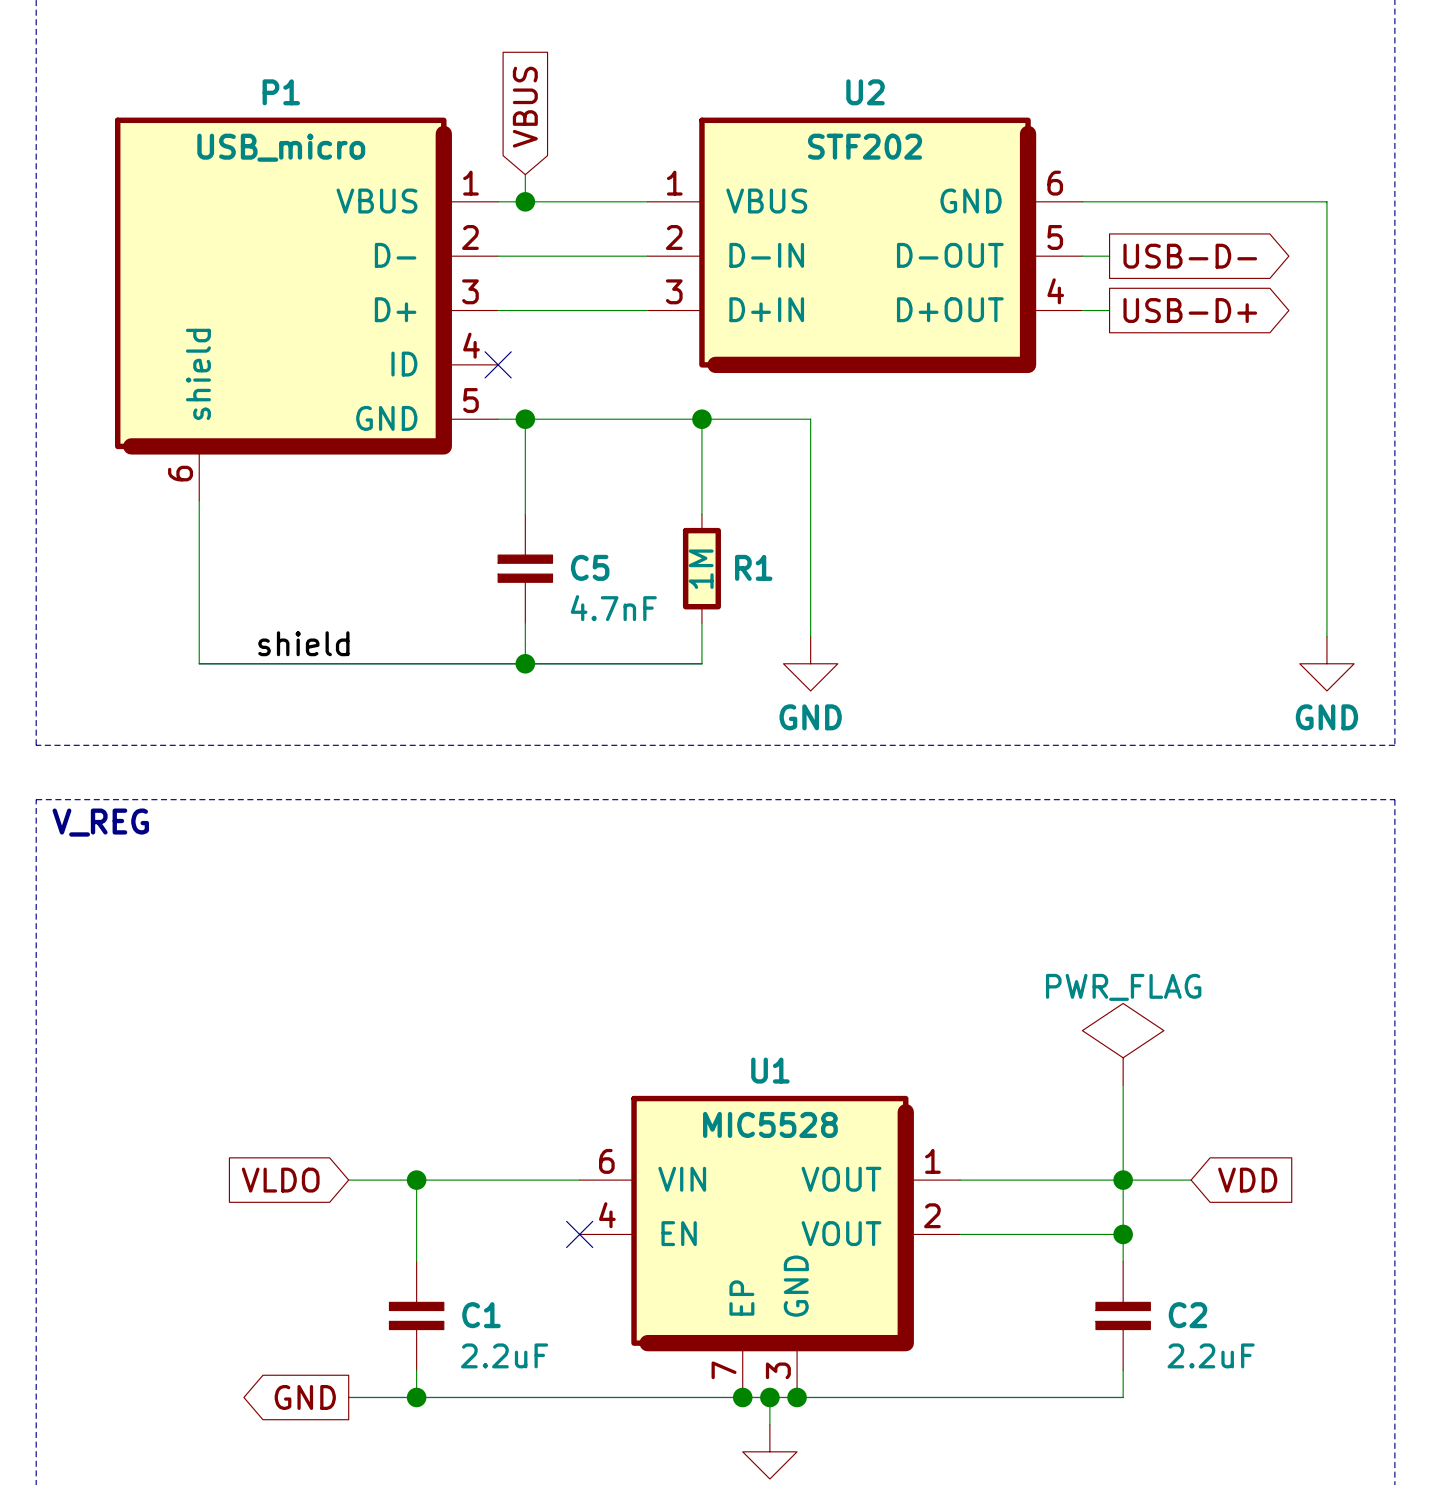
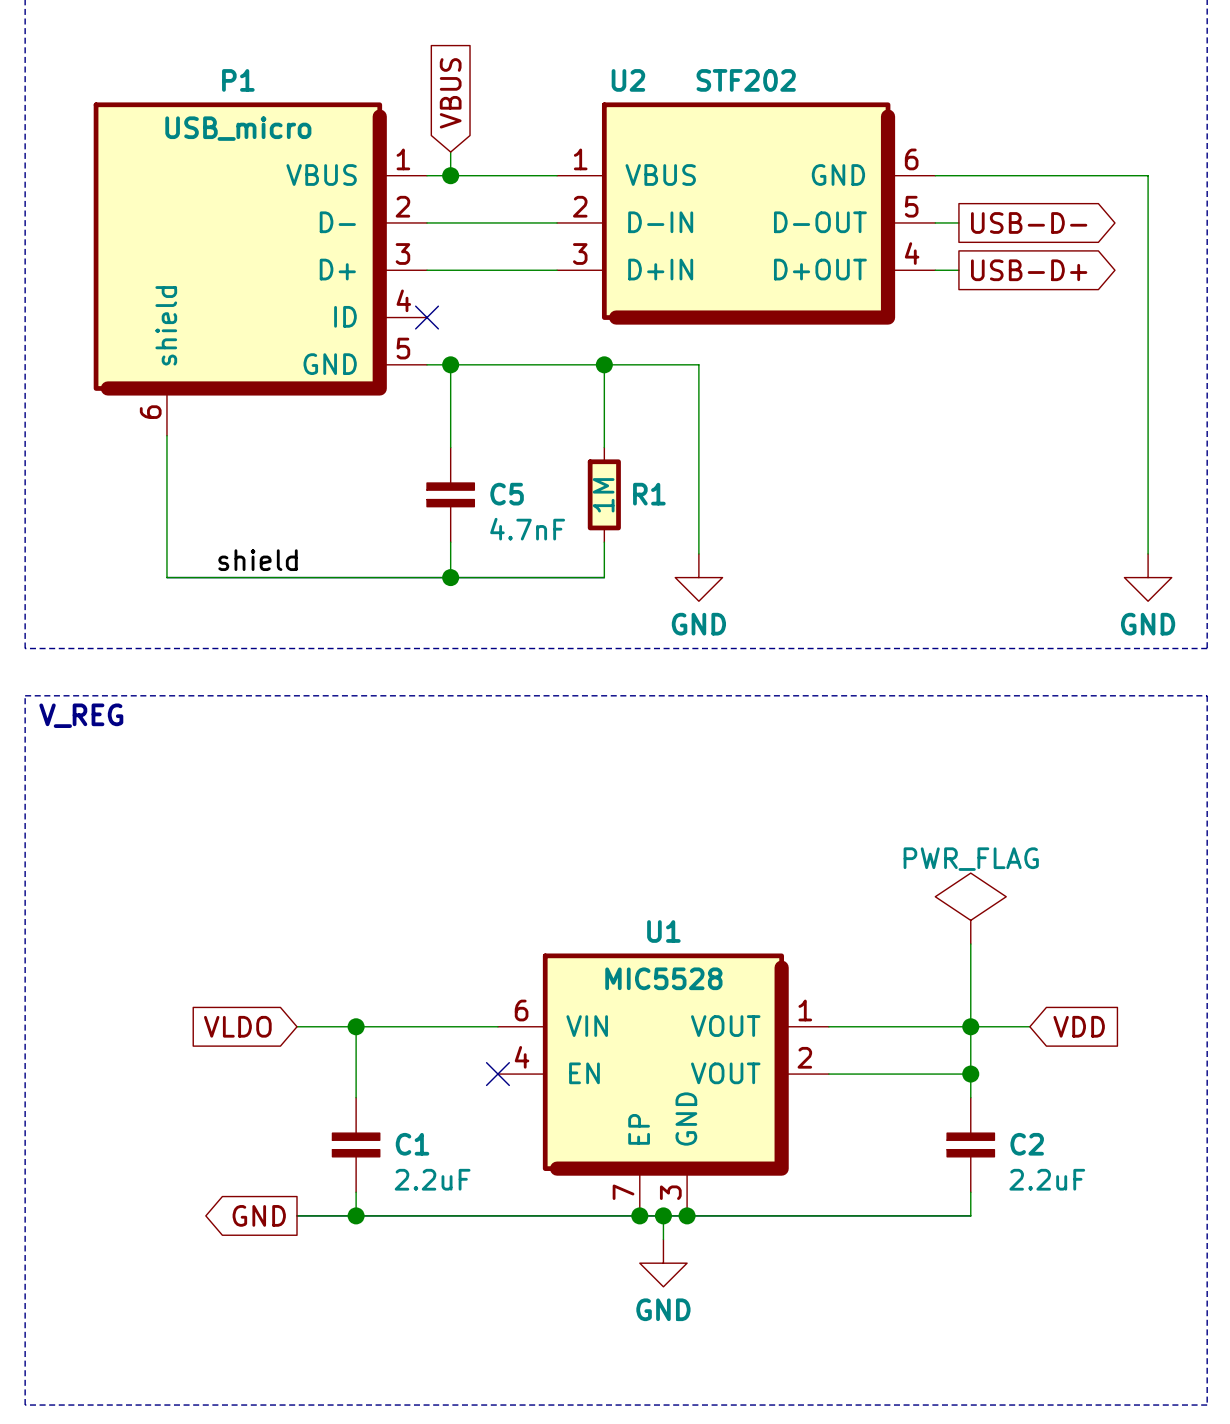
U2 name position: U2 (865, 92) -> U2 (628, 80)
U2 value position: STF202 (865, 146) -> STF202 (746, 80)

